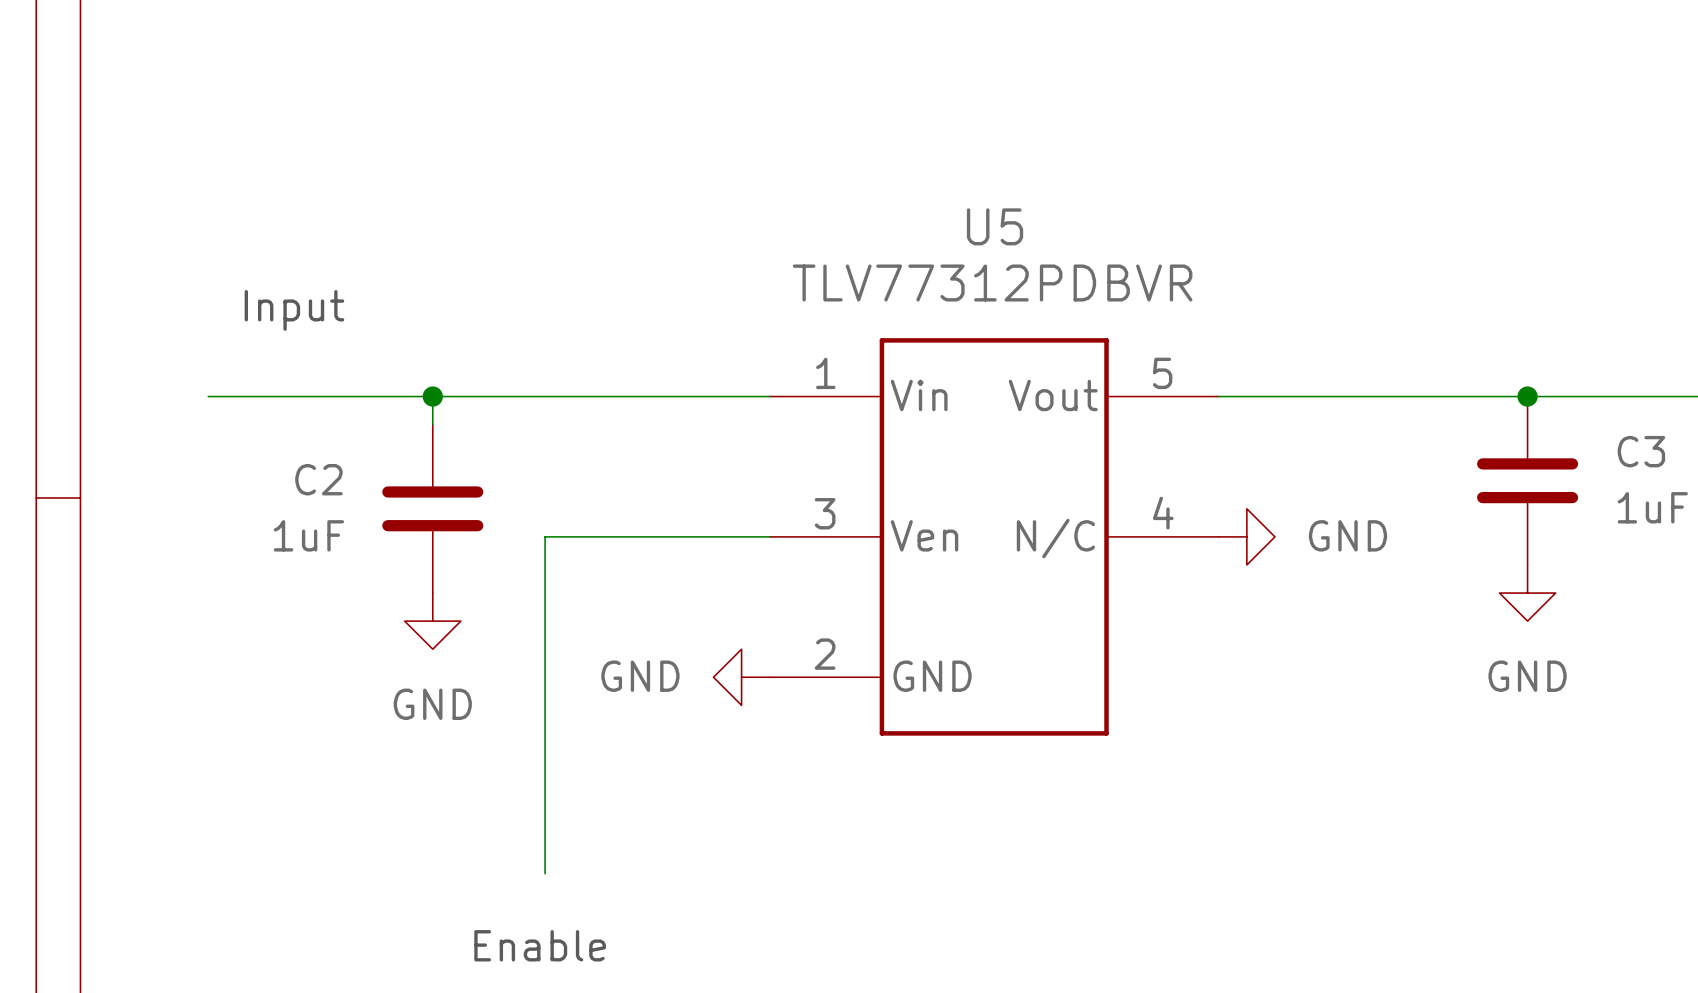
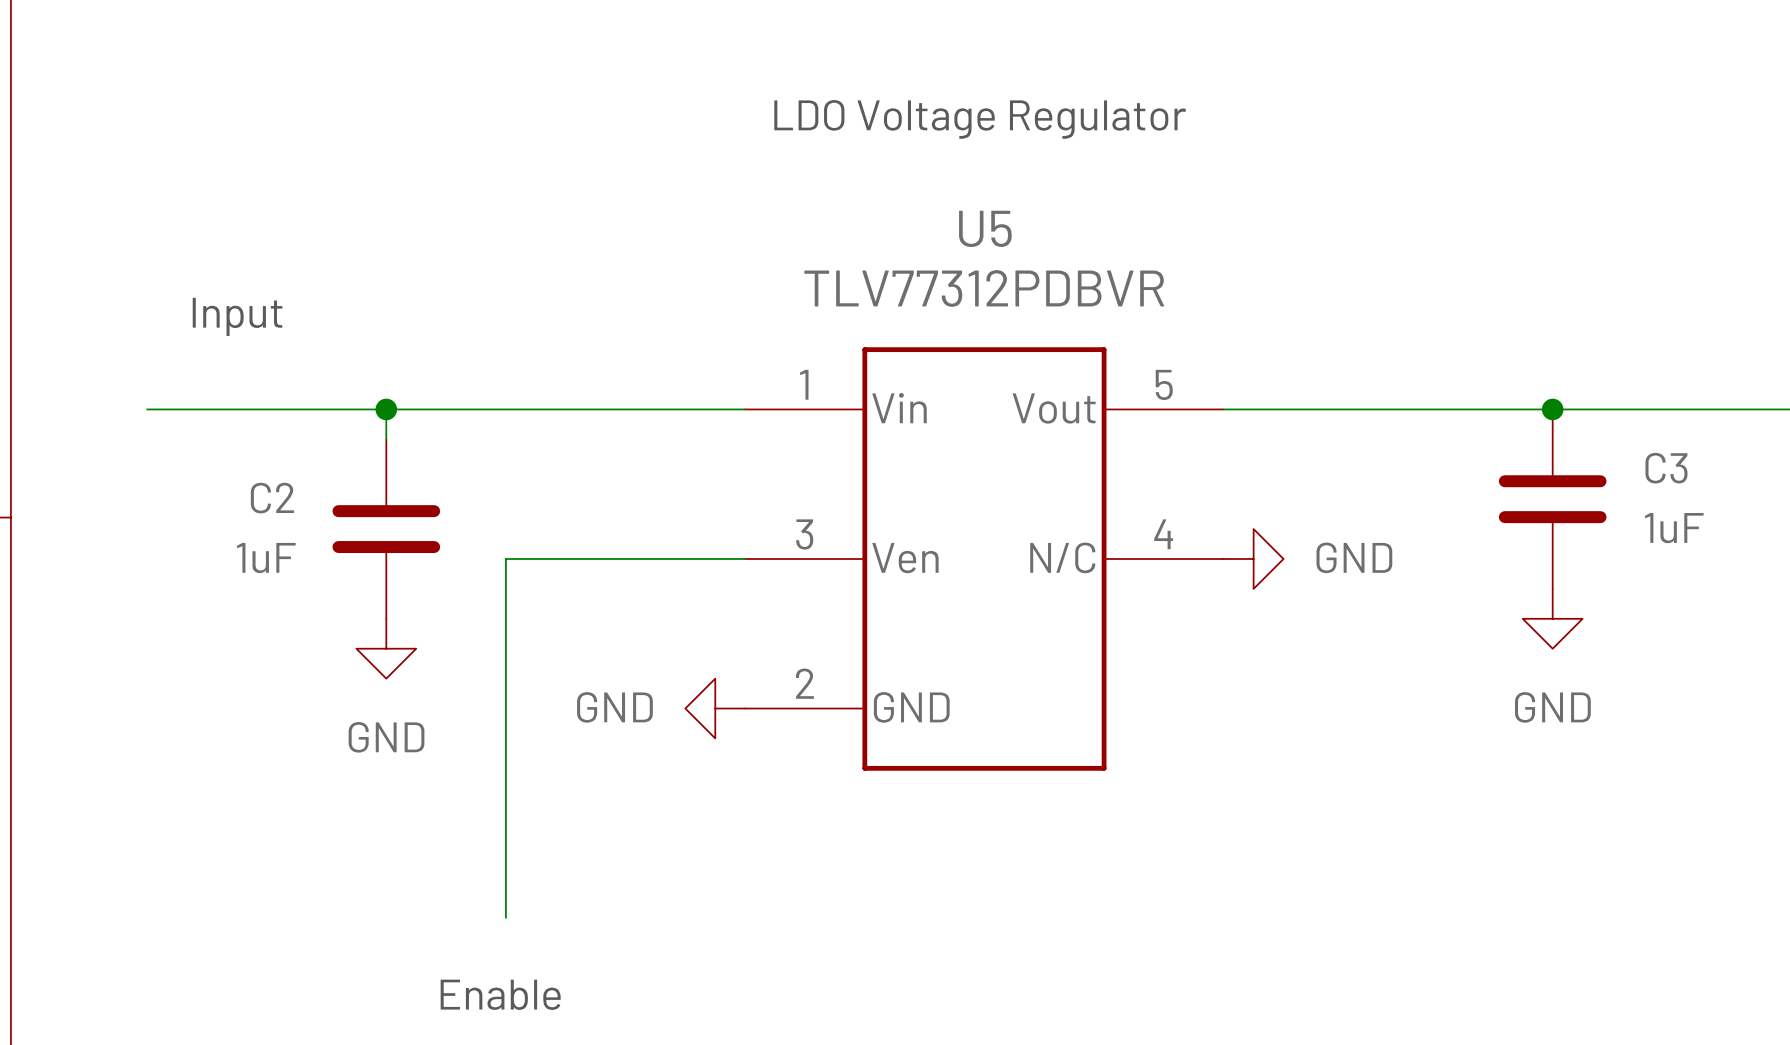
text: none -> LDO Voltage Regulator (980, 119)

